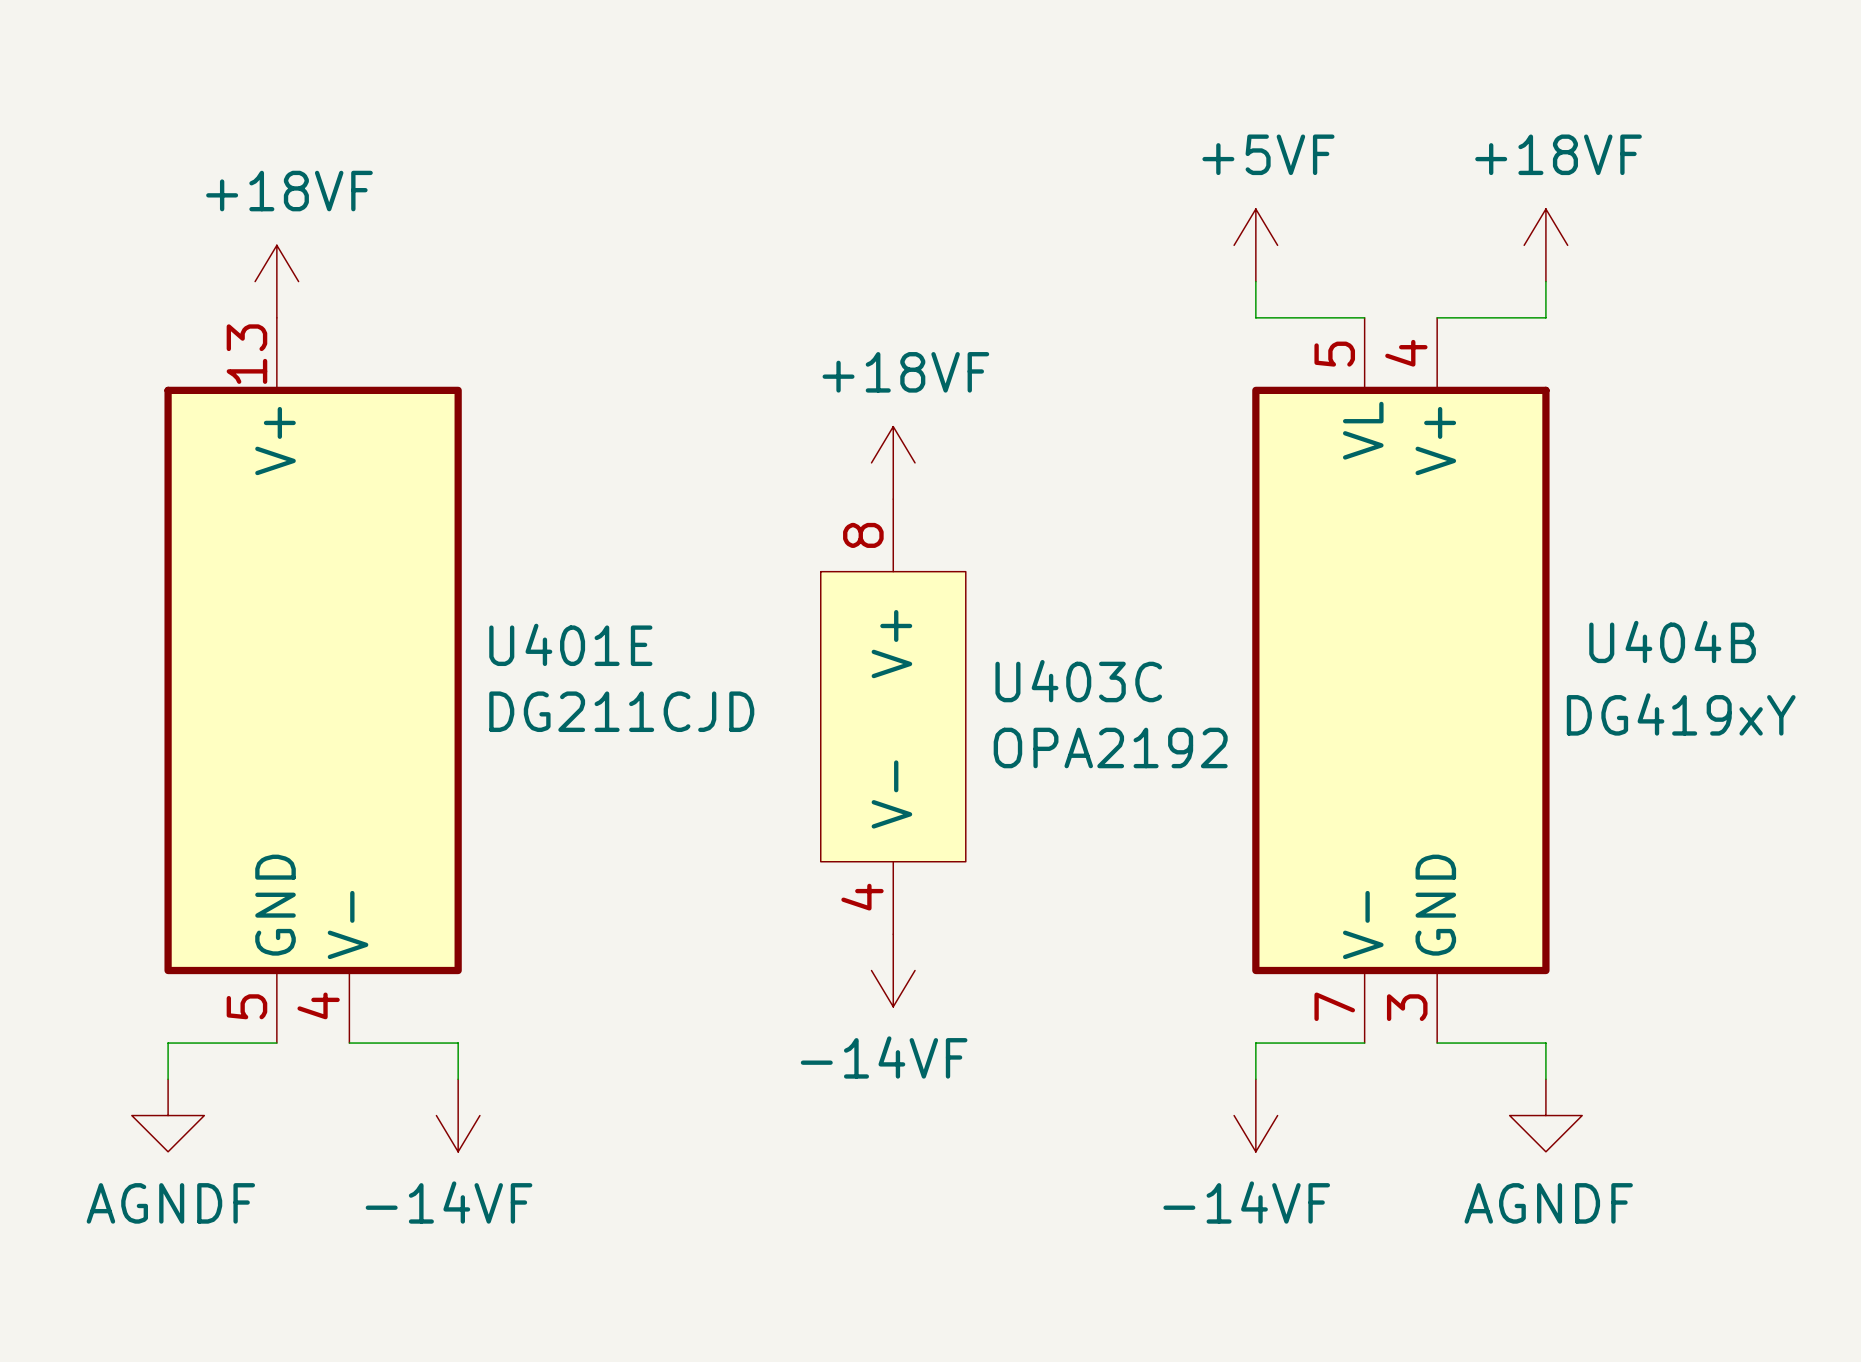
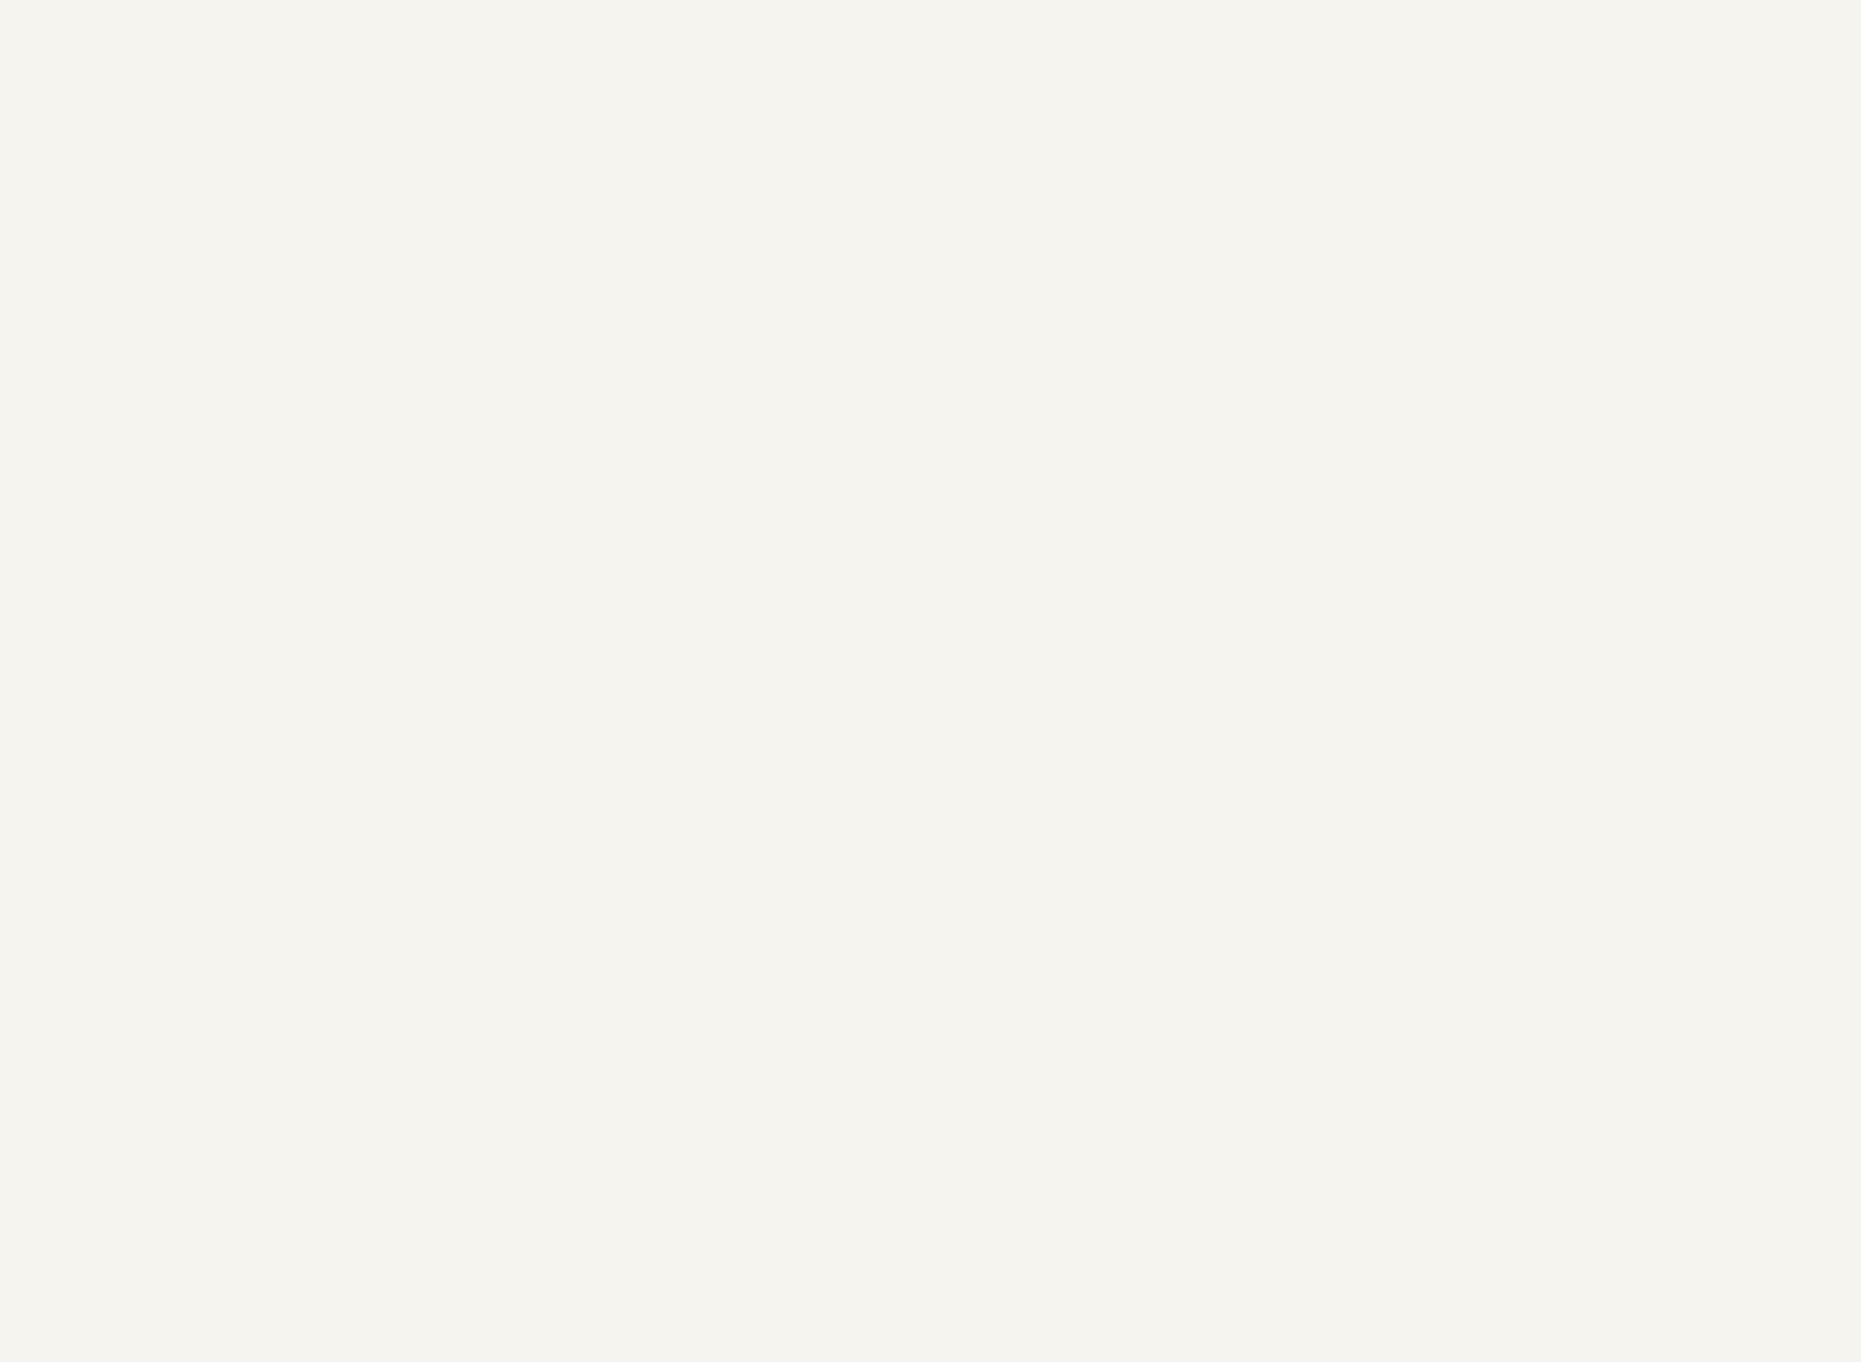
power symbol: +5VF (1255, 245) -> none
power symbol: +18VF (1545, 245) -> none
power symbol: +18VF (276, 281) -> none
wire: (1255, 281) (1255, 317) (1364, 317) -> none
wire: (1545, 281) (1545, 317) (1437, 317) -> none
power symbol: +18VF (893, 462) -> none
U401E: DG211CJD (313, 680) -> none
U404B: DG419xY (1400, 680) -> none
U403C: OPA2192 (893, 716) -> none
power symbol: -14VF (893, 970) -> none
wire: (276, 1043) (168, 1043) (168, 1079) -> none
wire: (349, 1043) (458, 1043) (458, 1079) -> none
wire: (1364, 1043) (1255, 1043) (1255, 1079) -> none
wire: (1437, 1043) (1545, 1043) (1545, 1079) -> none
power symbol: AGNDF (168, 1115) -> none
power symbol: -14VF (458, 1115) -> none
power symbol: -14VF (1255, 1115) -> none
power symbol: AGNDF (1545, 1115) -> none

